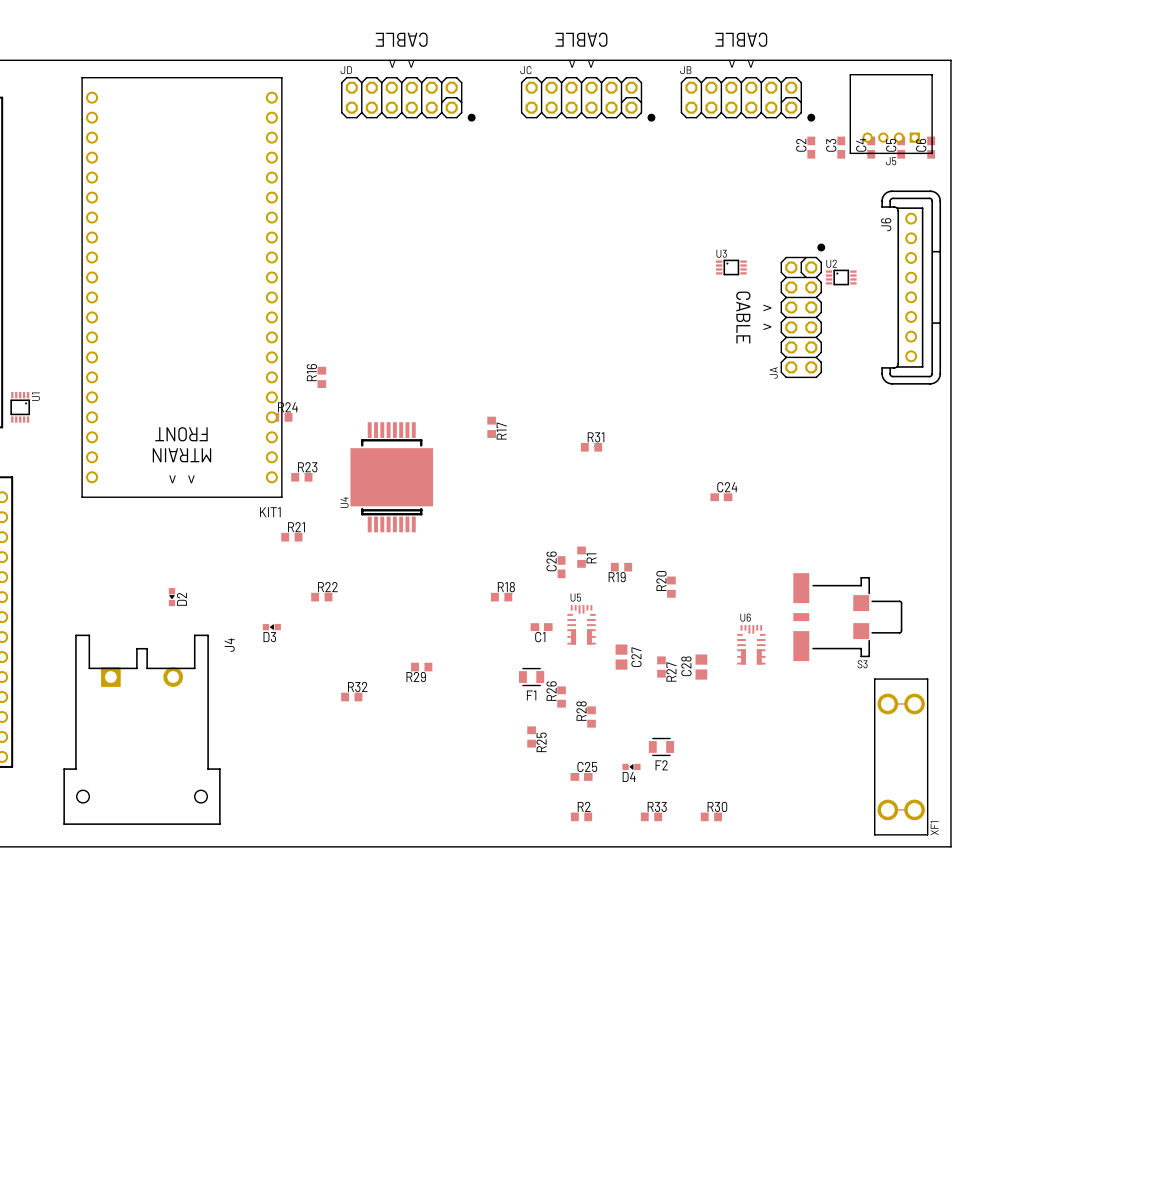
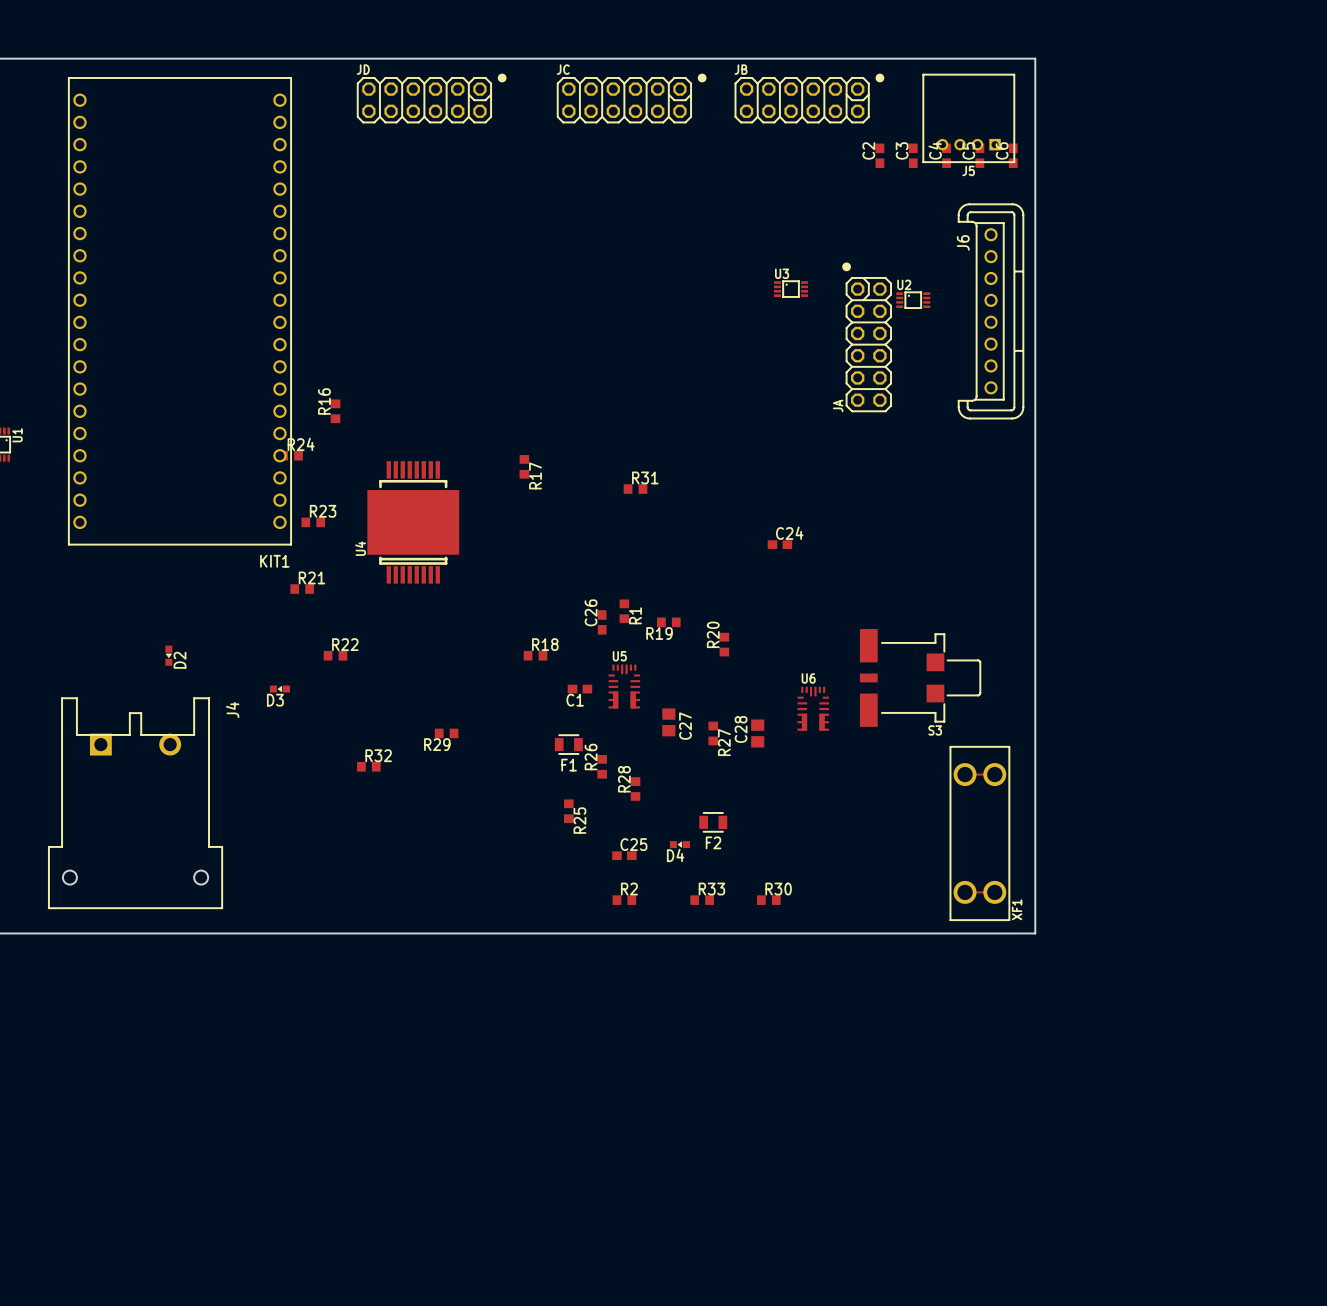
JD footprint: [341, 77, 476, 122] -> [357, 73, 507, 124]
JC footprint: [521, 77, 656, 122] -> [557, 73, 707, 124]
JB footprint: [680, 77, 816, 122] -> [734, 73, 885, 124]
JA footprint: [780, 243, 826, 378] -> [842, 262, 892, 412]
KIT1 text: FRONT (181, 434) -> none
KIT1 text: MTRAIN (181, 455) -> none
KIT1 text: ^ ^ (181, 479) -> none

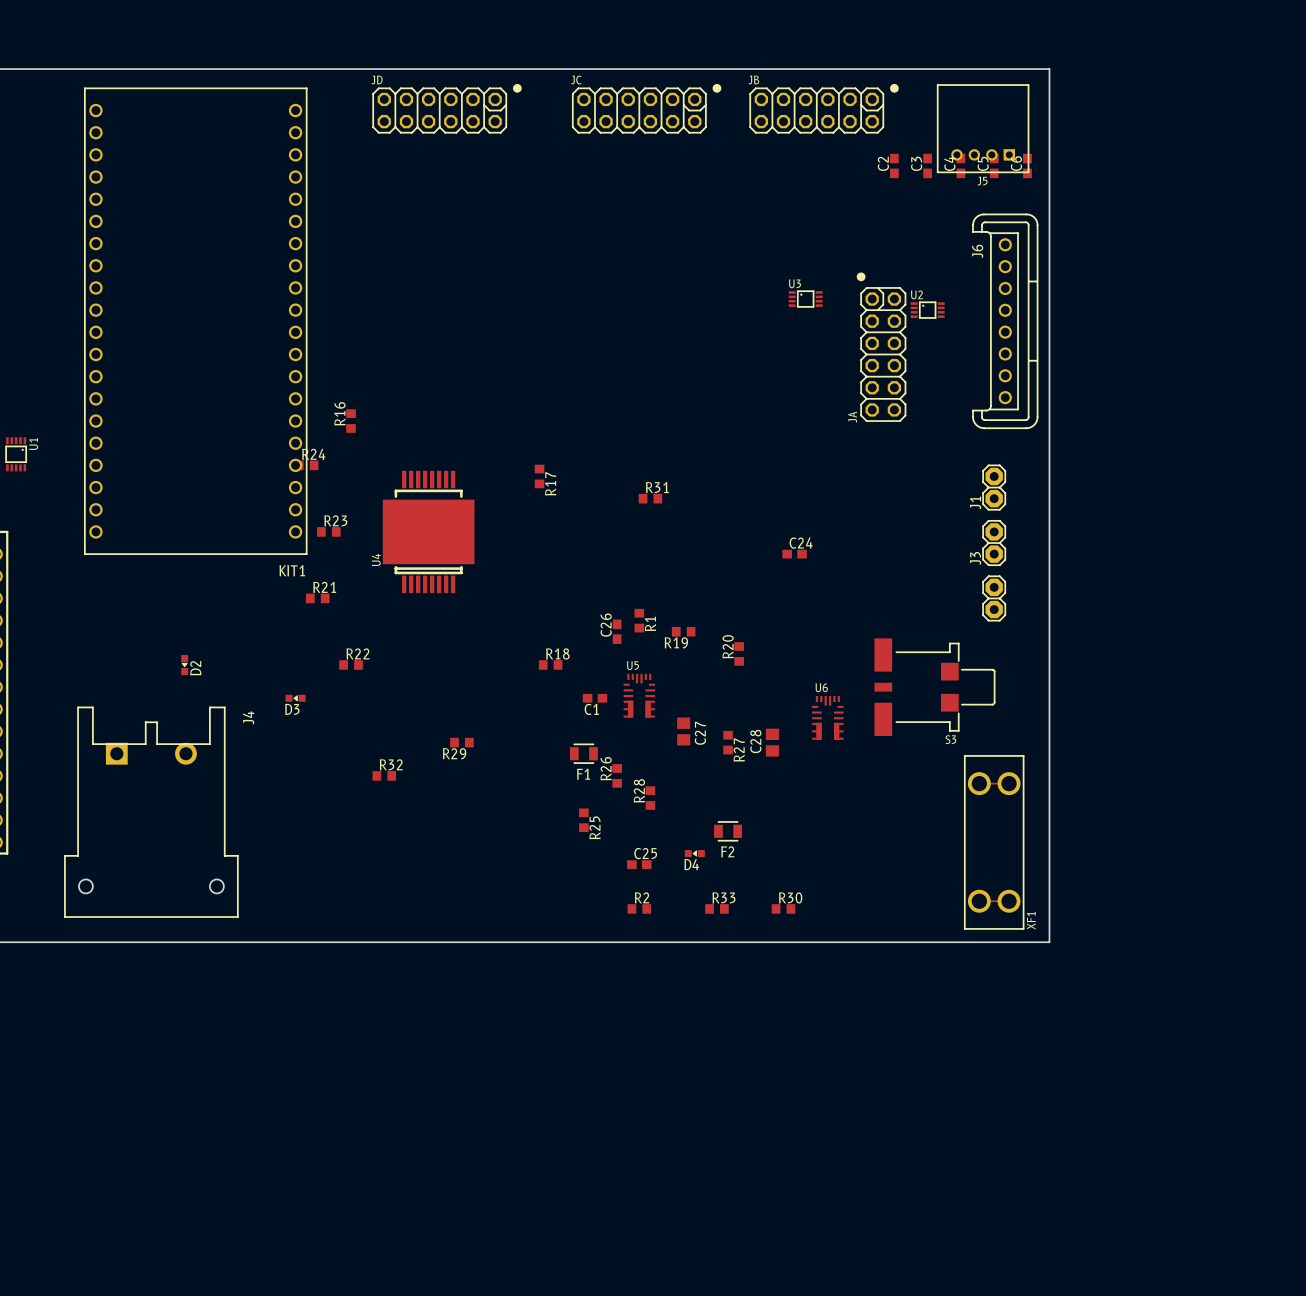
J1: none -> (994, 487)
J3: none -> (994, 543)
part: none -> (994, 598)

